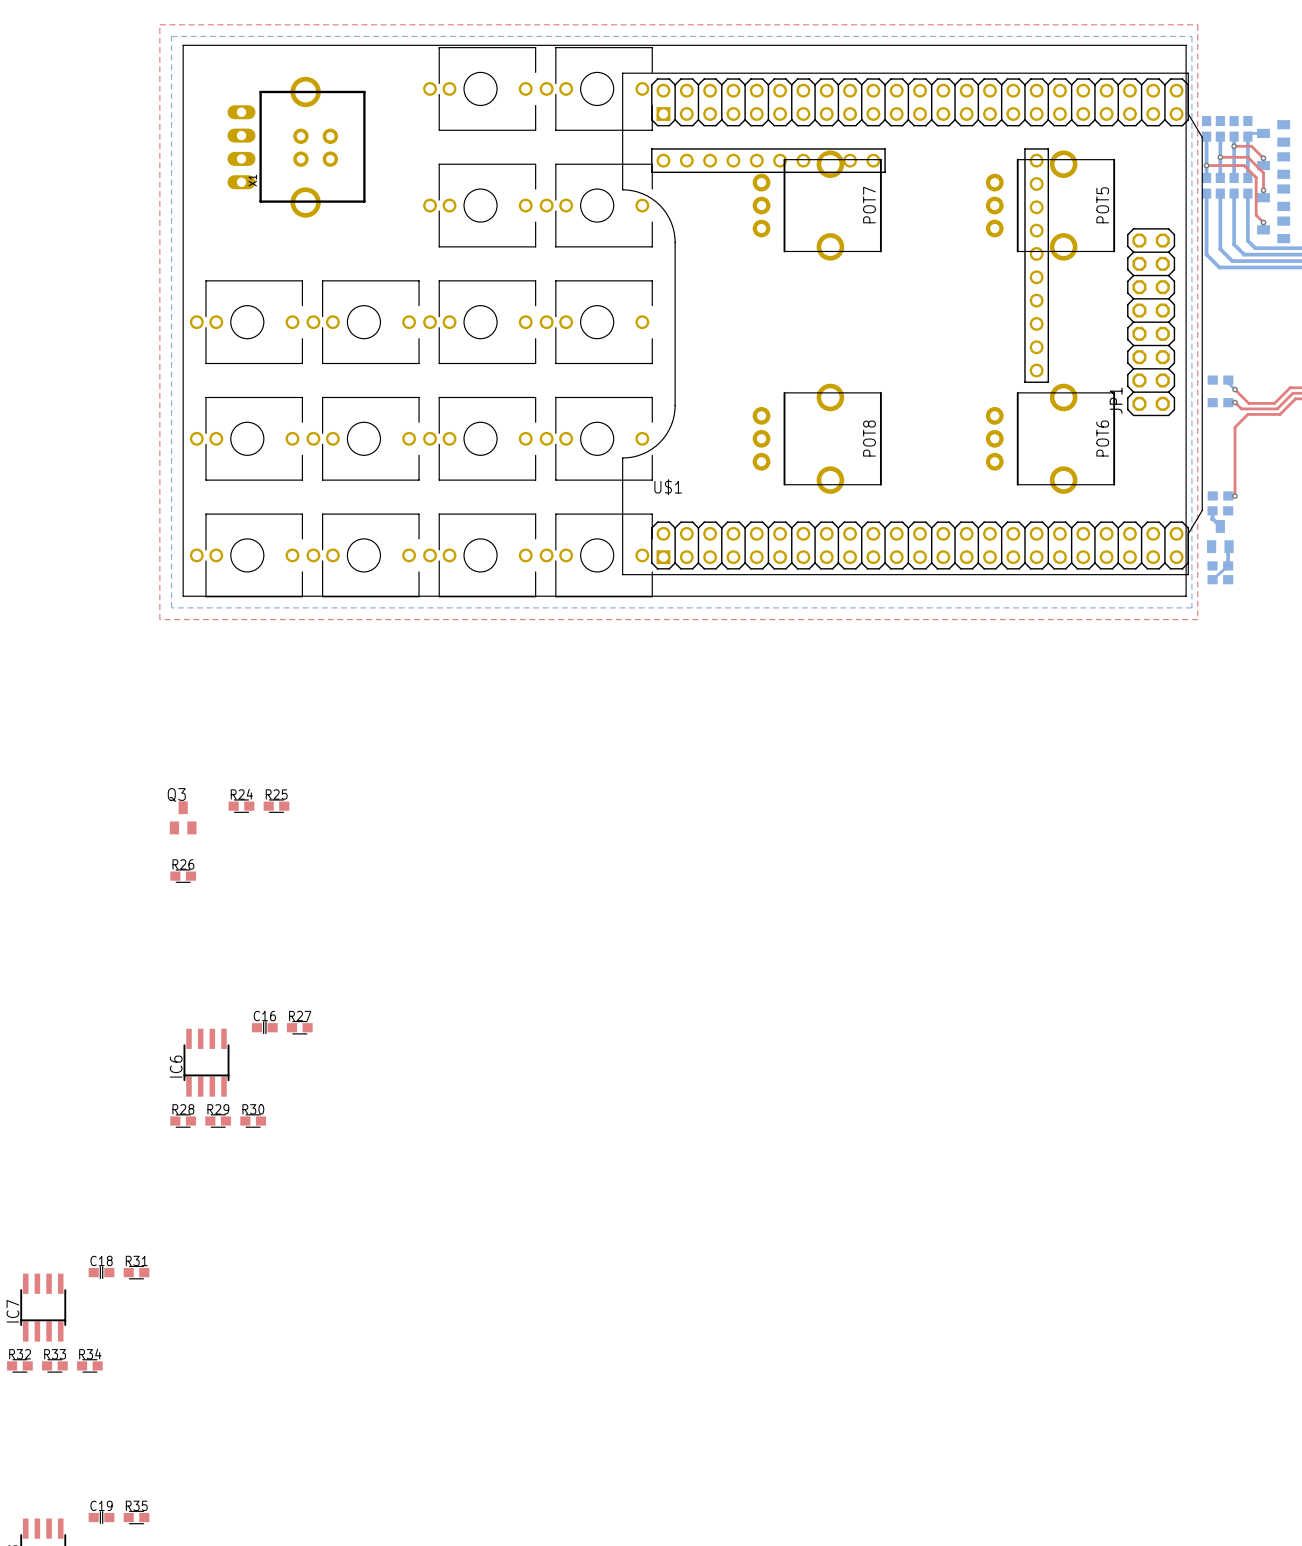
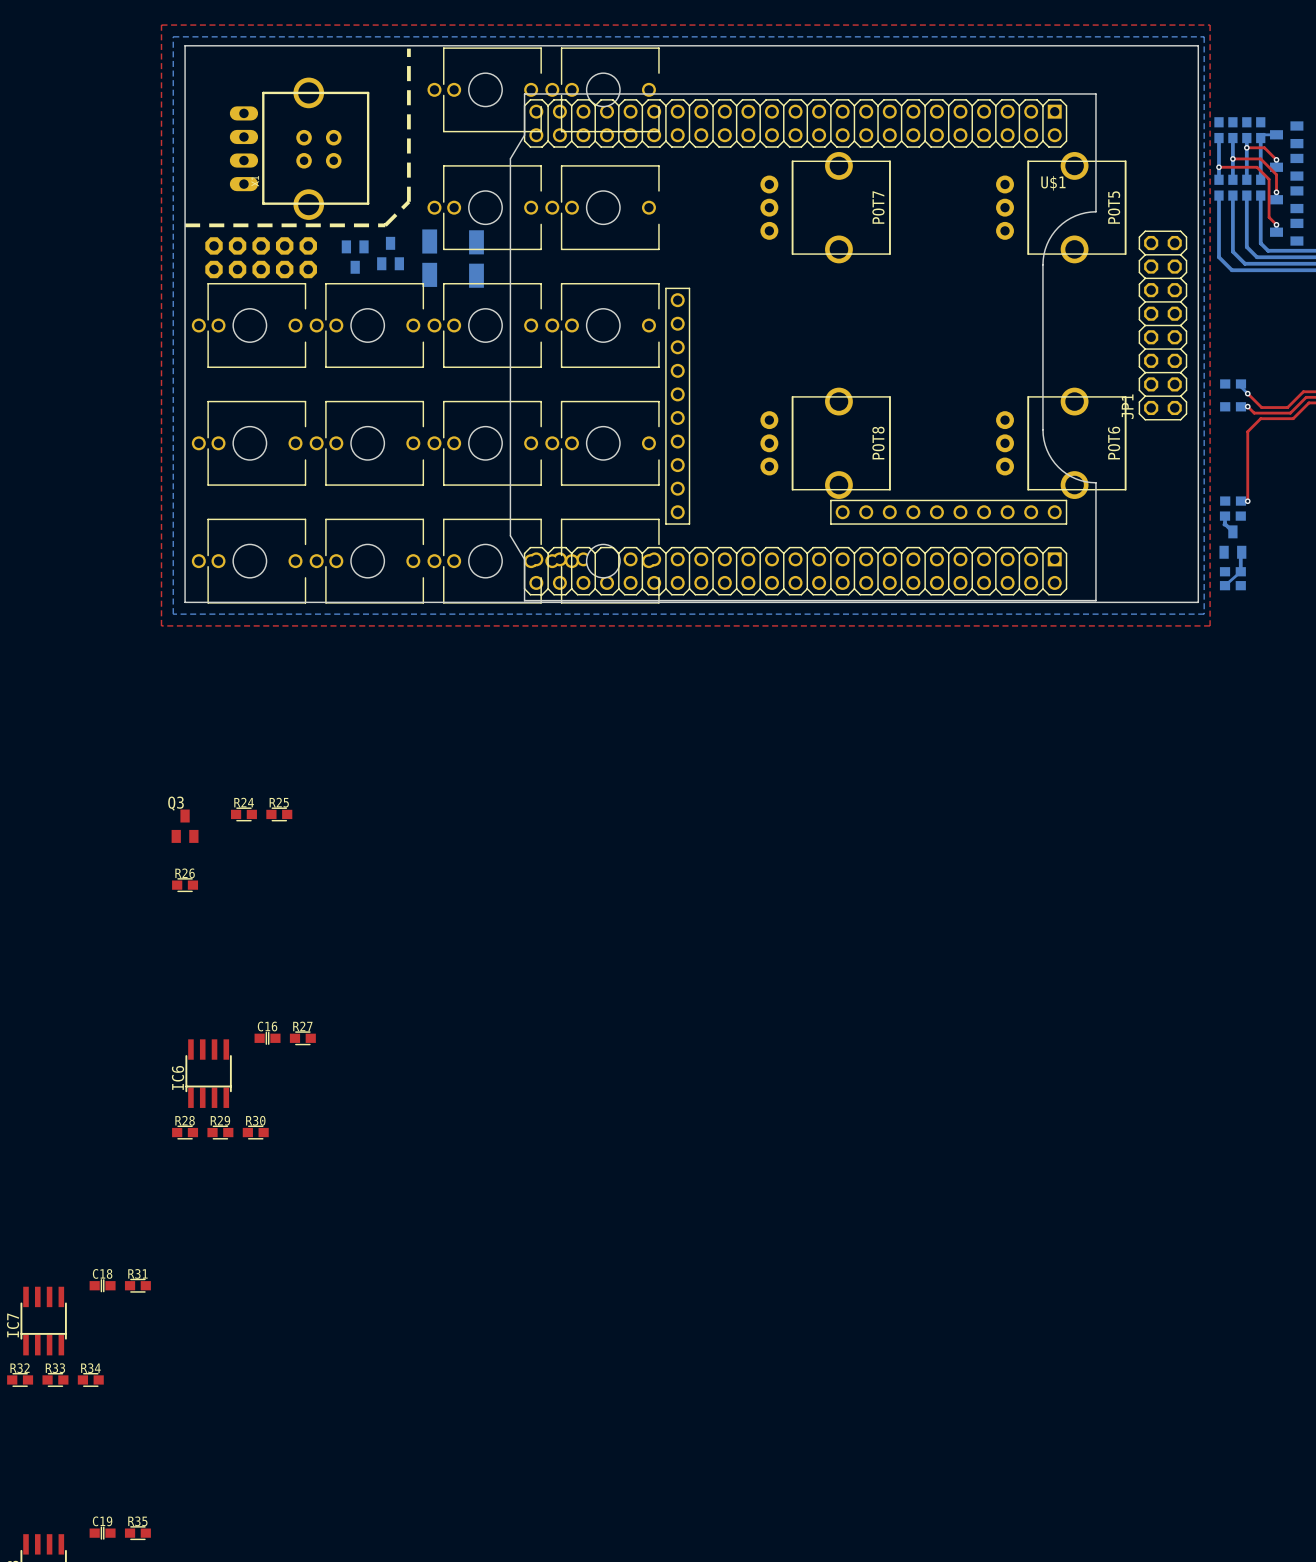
line: none -> (408, 48) (408, 201) (385, 225) (185, 225)
part: none -> (390, 253)
part: none -> (355, 257)
part: none -> (261, 257)
part: none -> (429, 258)
part: none -> (476, 259)
U$1 rotation: 0° (912, 323) -> 180° (803, 347)

